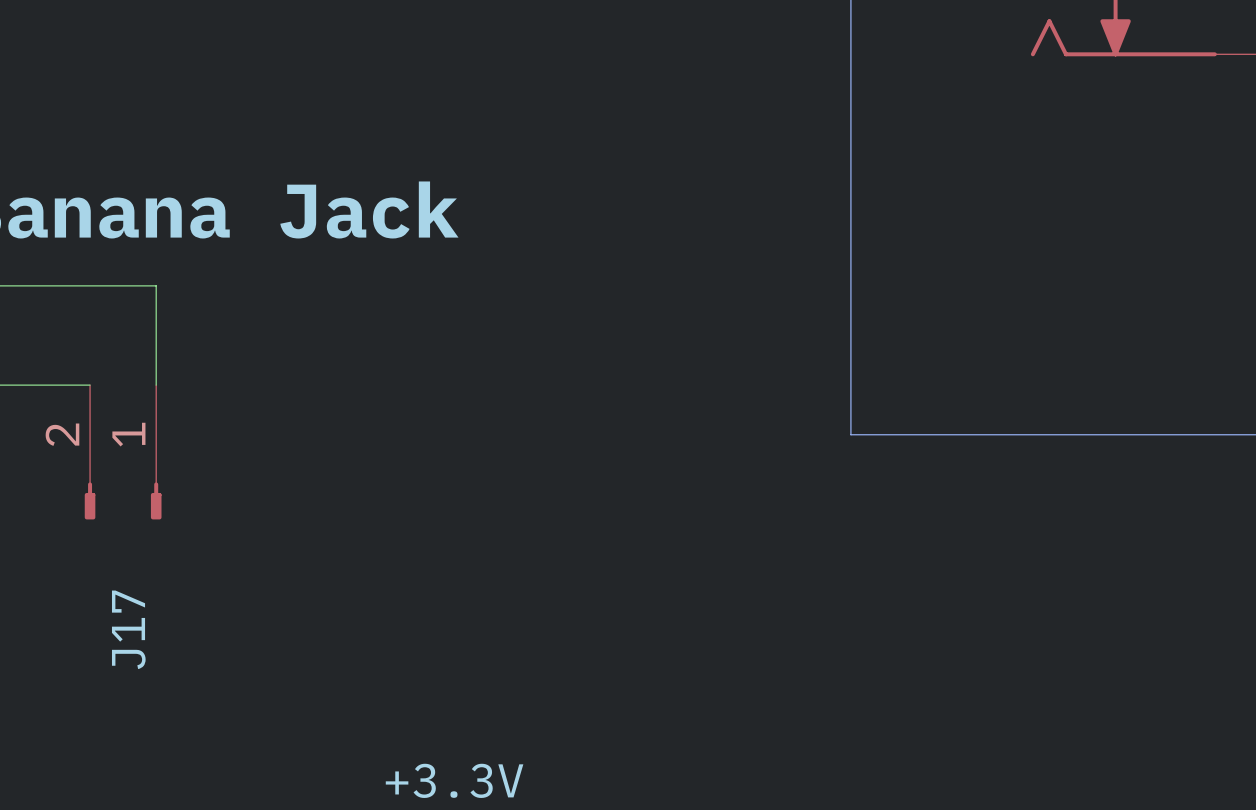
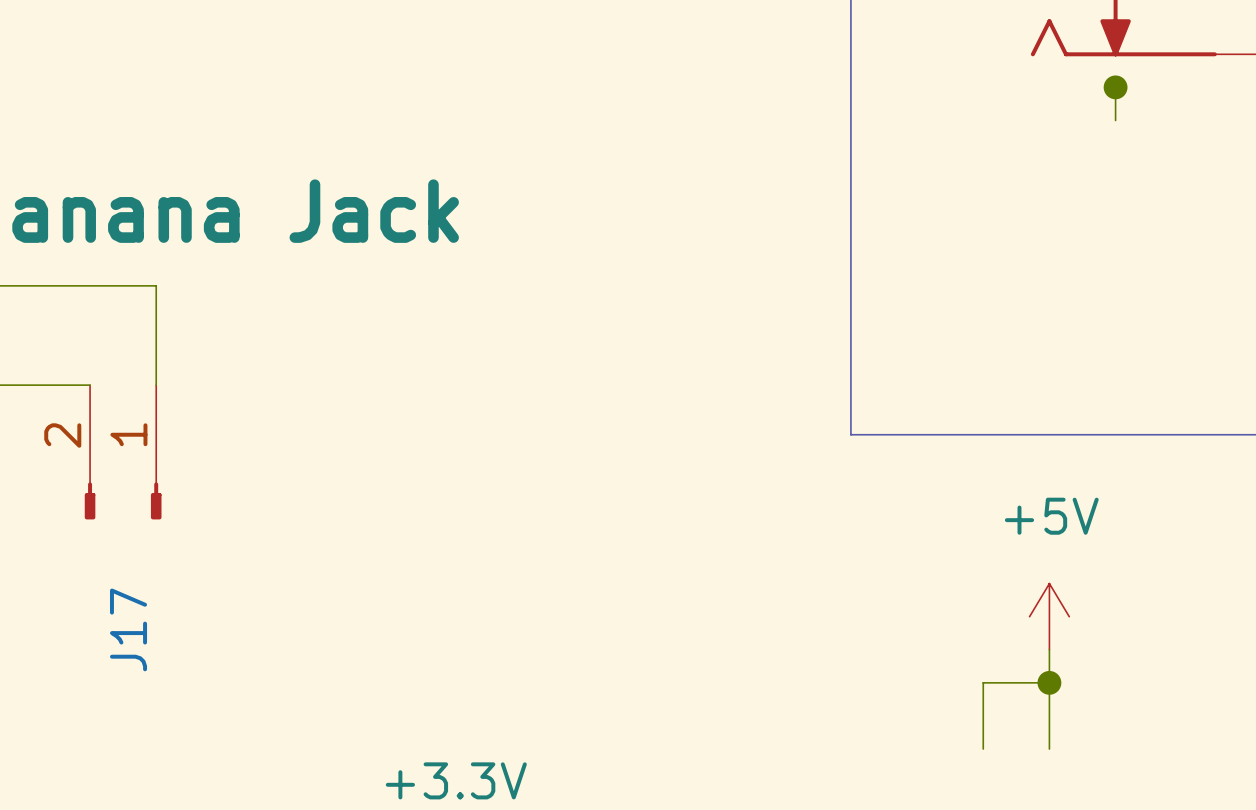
wire: none -> (1115, 87) (1115, 120)
junction: none -> (1115, 87)
power symbol: none -> +5V (1049, 616)
wire: none -> (1049, 649) (1049, 749)
wire: none -> (1049, 682) (983, 682) (983, 749)
junction: none -> (1049, 682)

